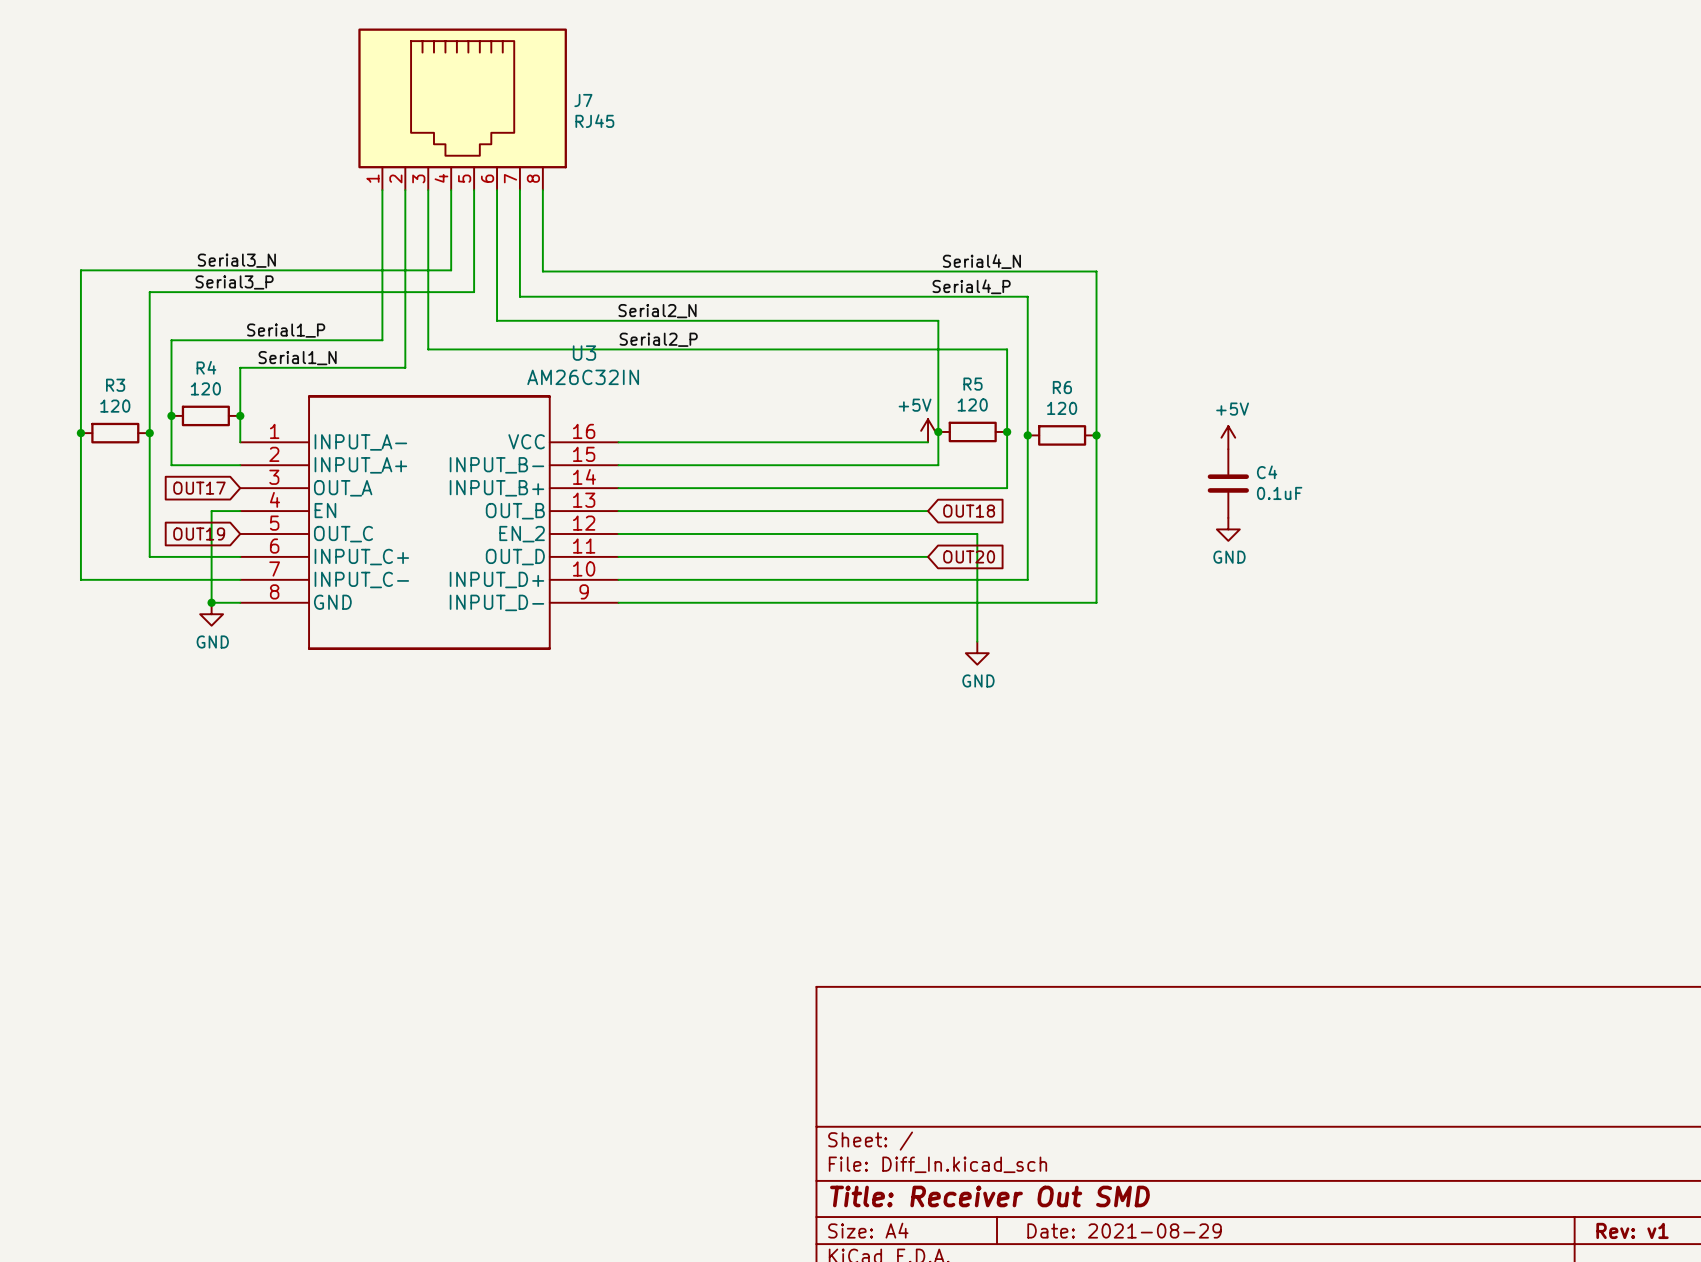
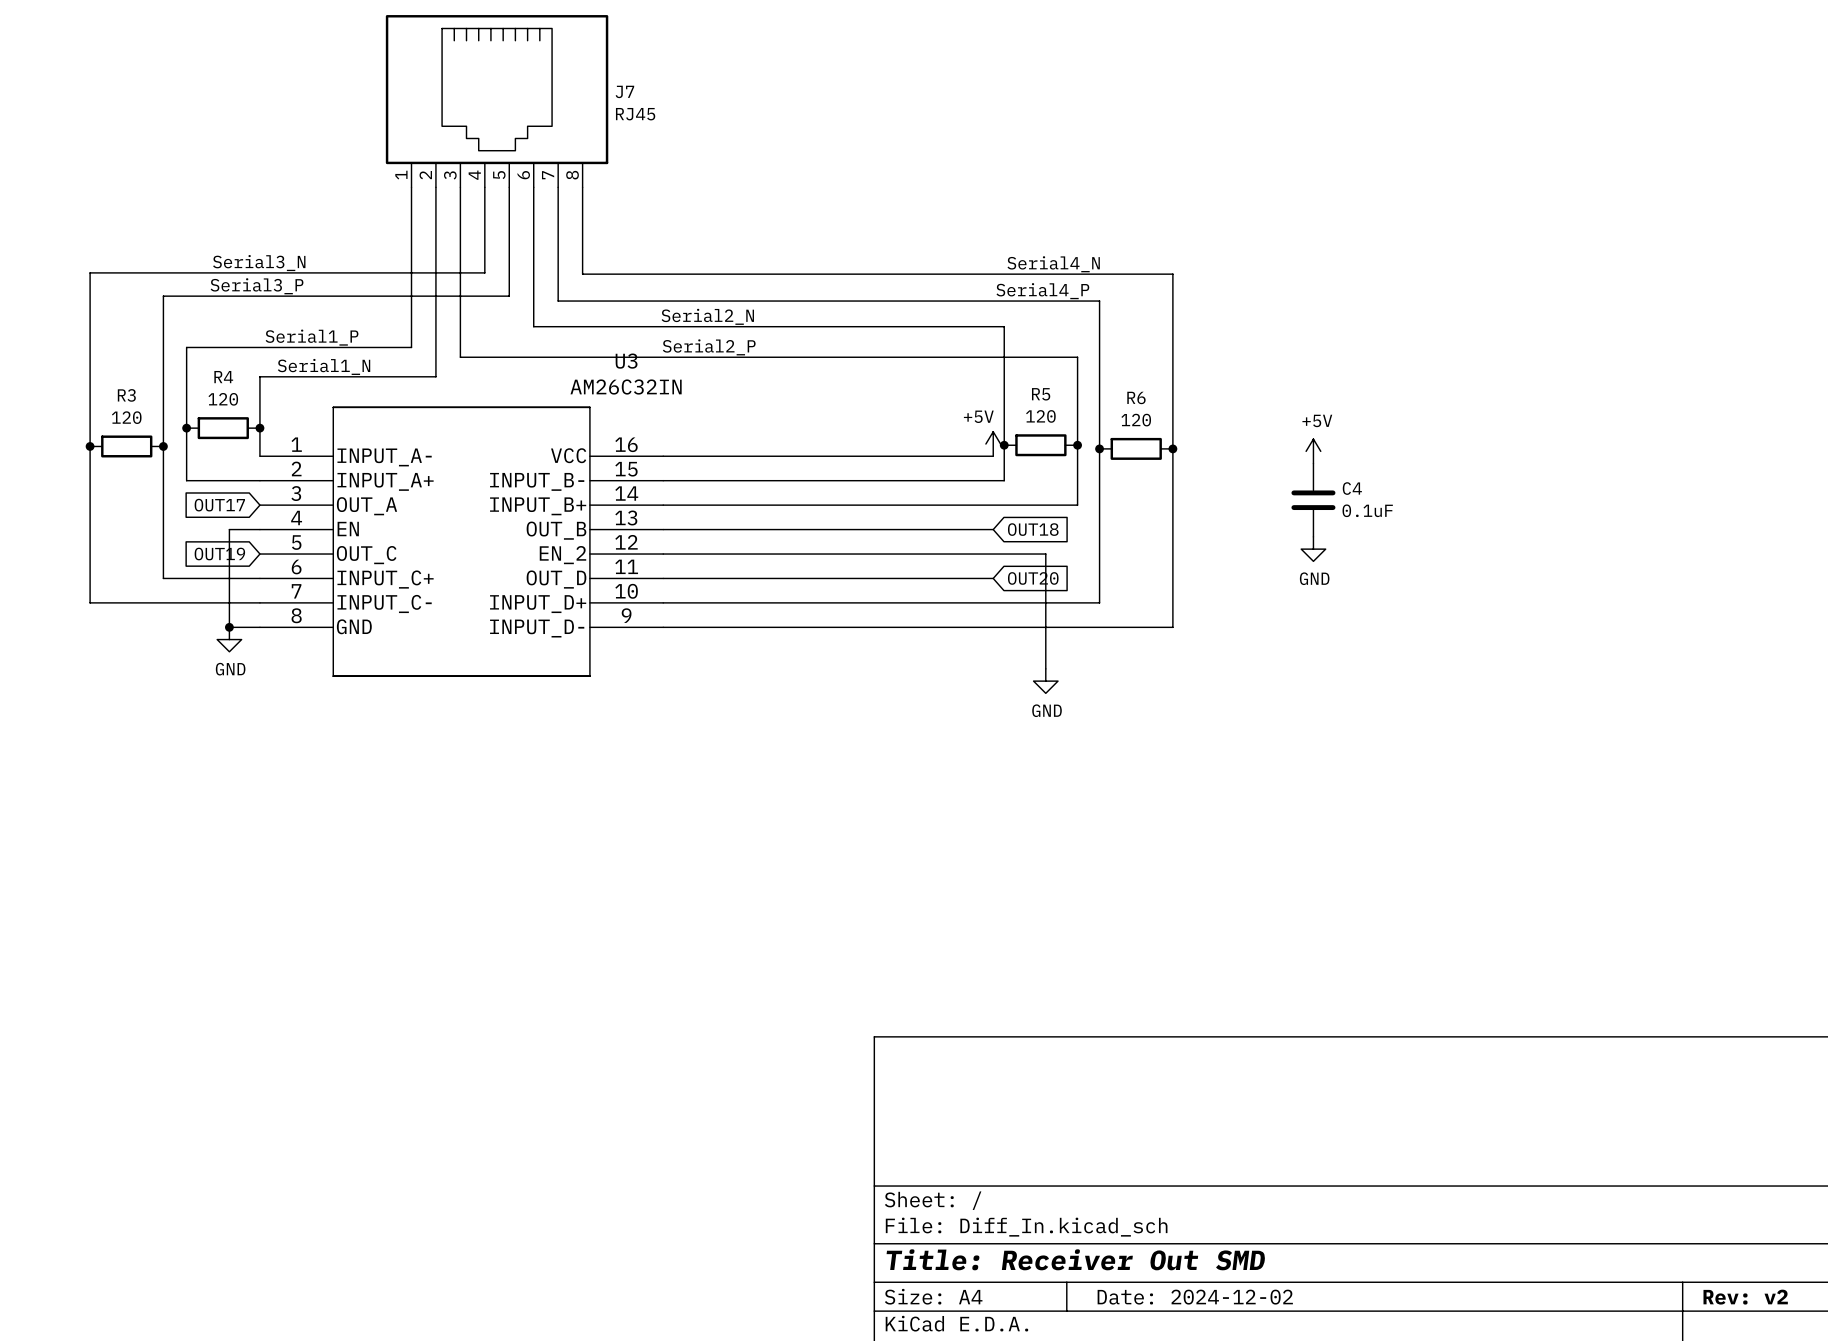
title block: Date: 2021-08-29 (1124, 1230) -> Date: 2024-12-02 (1195, 1297)
title block: Rev: v1 (1632, 1230) -> Rev: v2 (1745, 1297)

